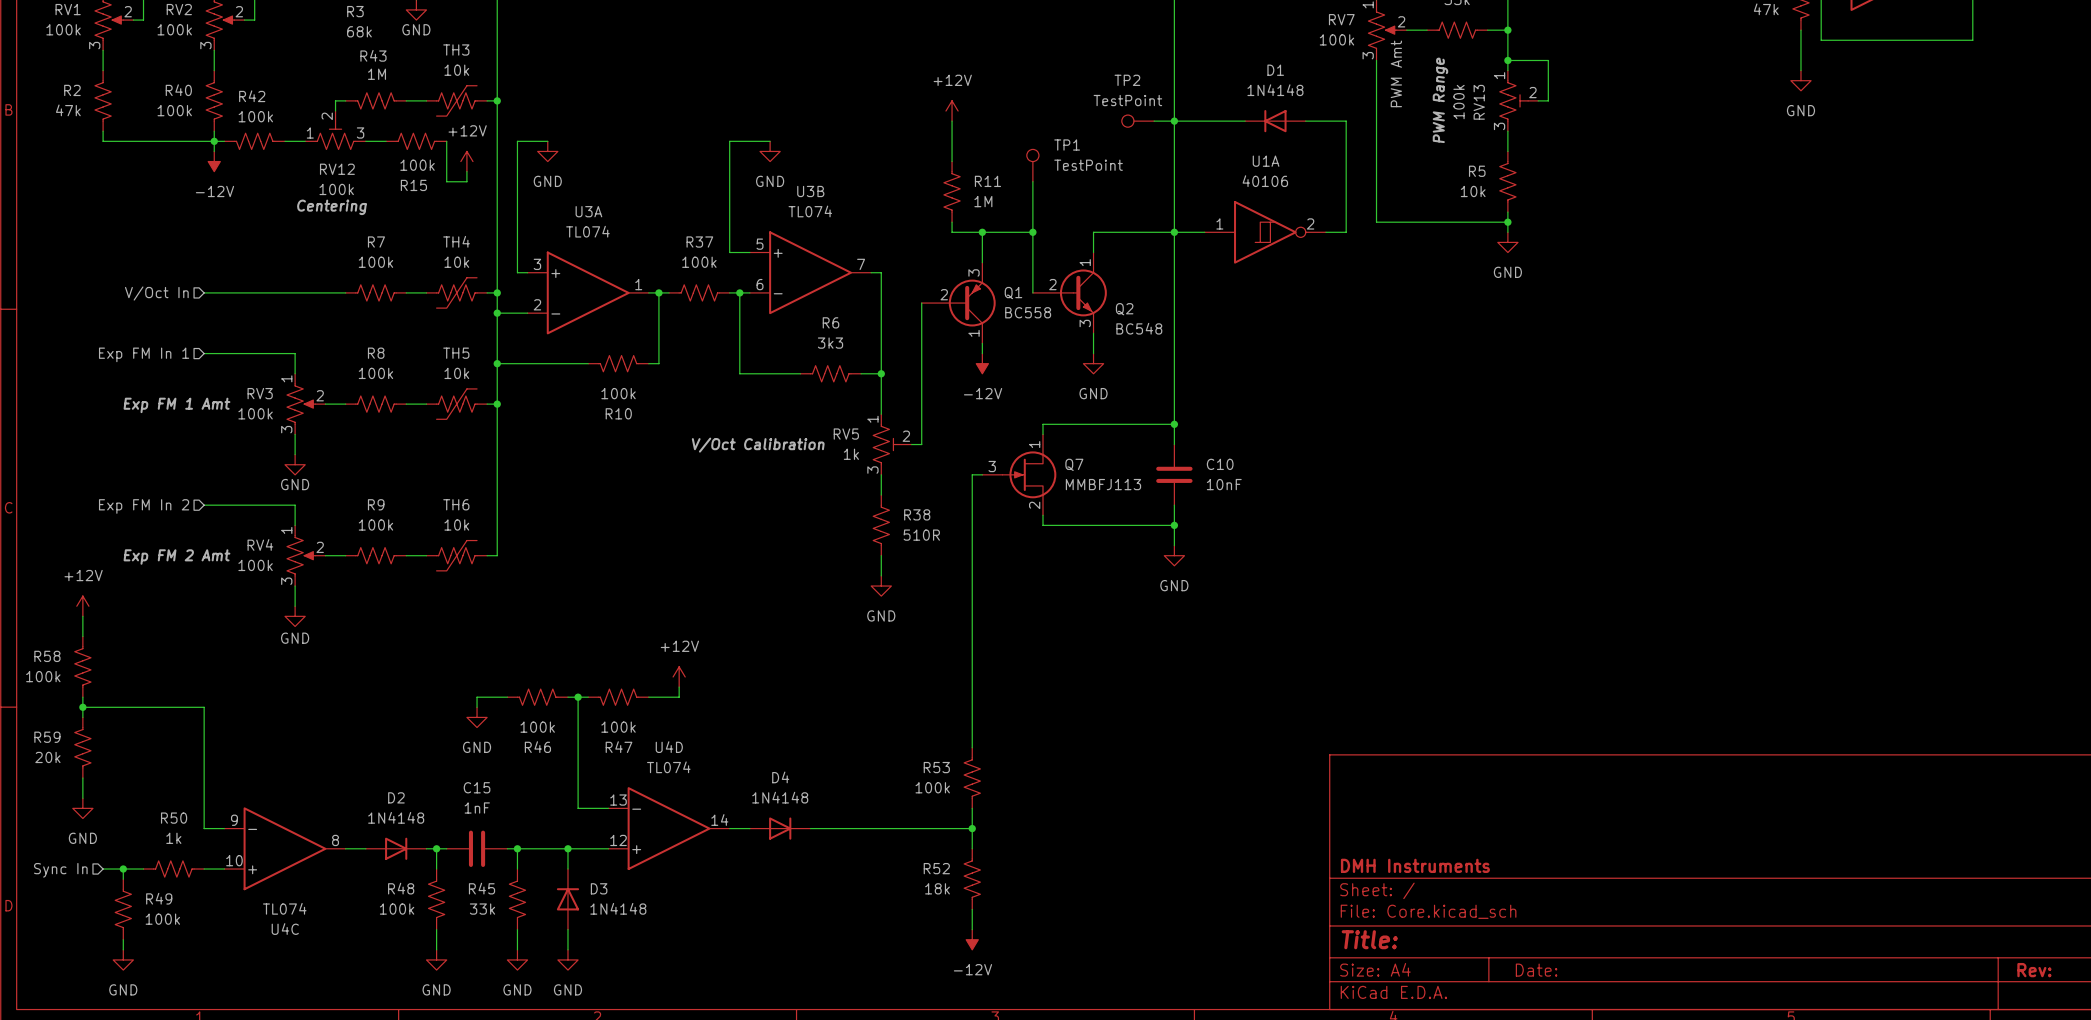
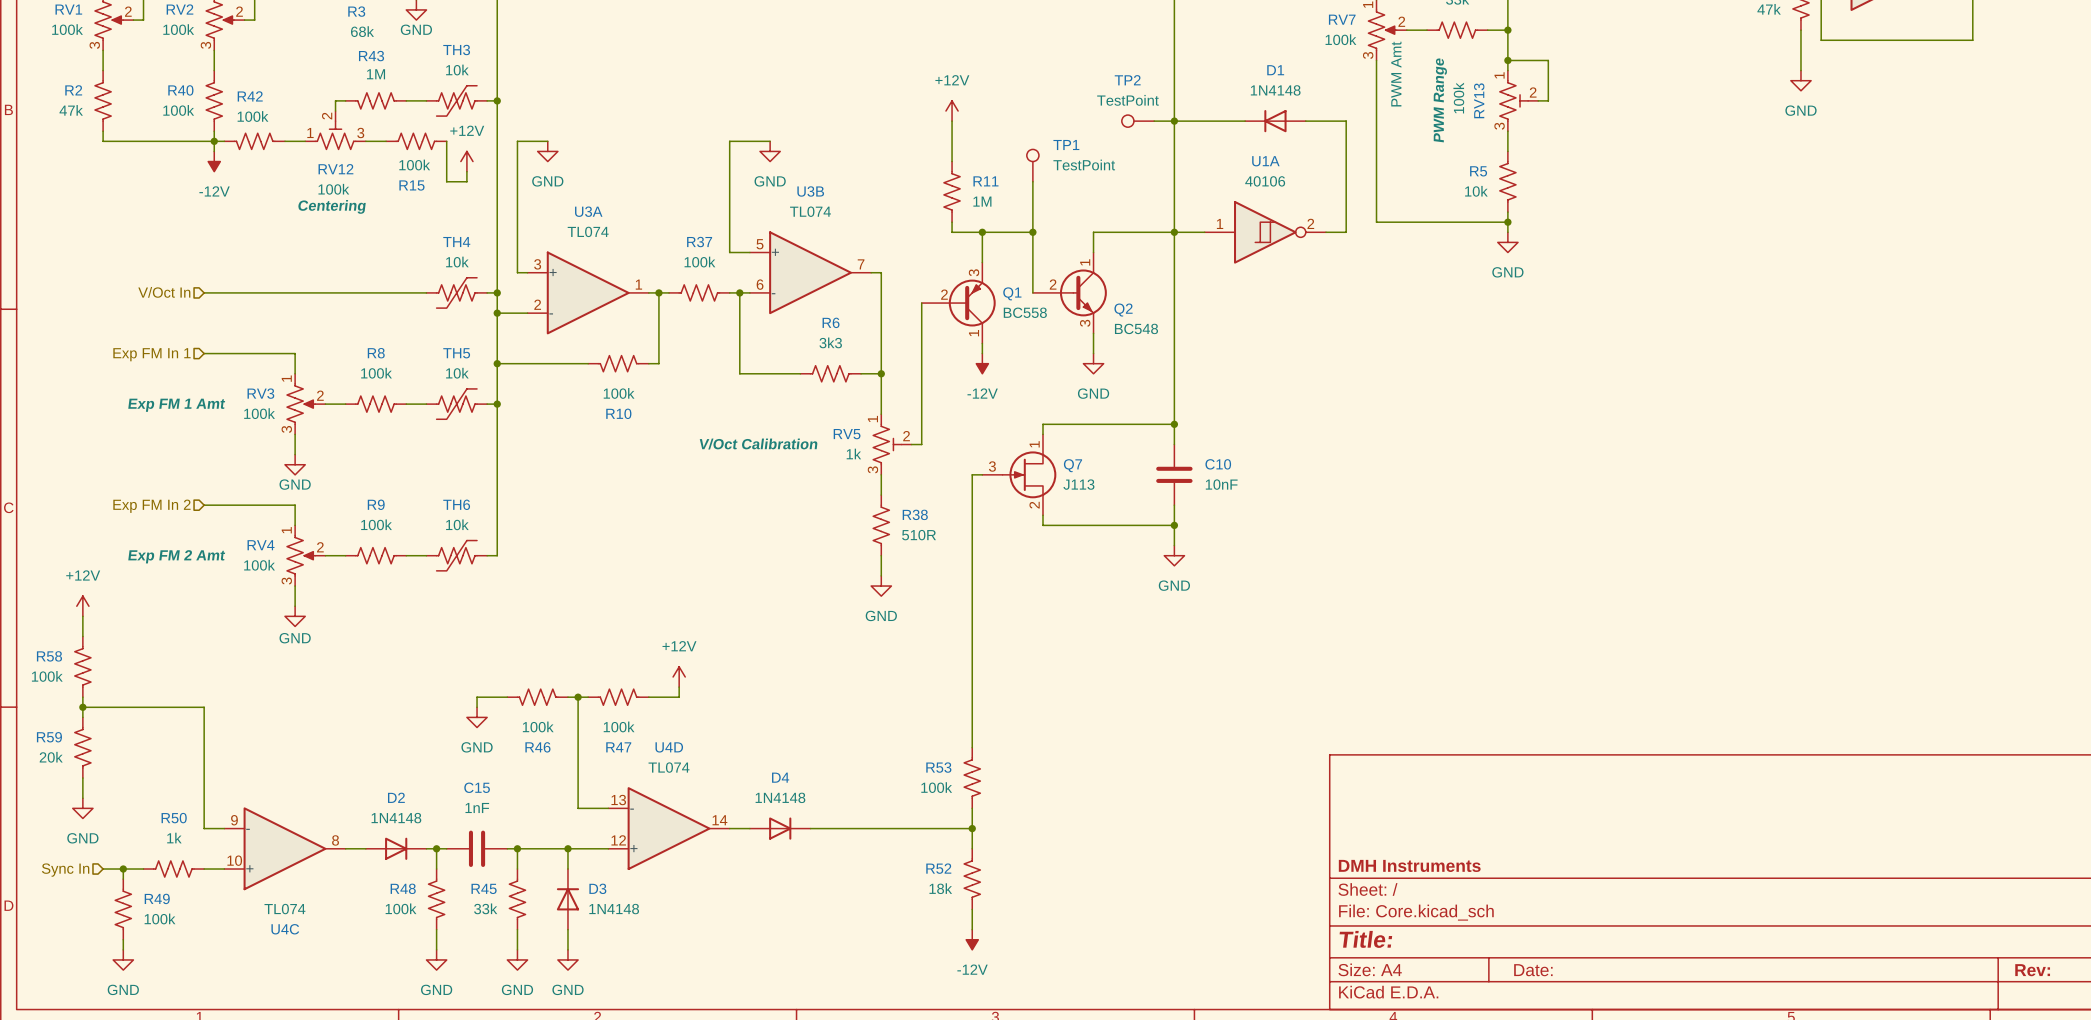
R7: 100k (375, 292) -> none
Q7 value: MMBFJ113 (1103, 484) -> J113 (1078, 484)

